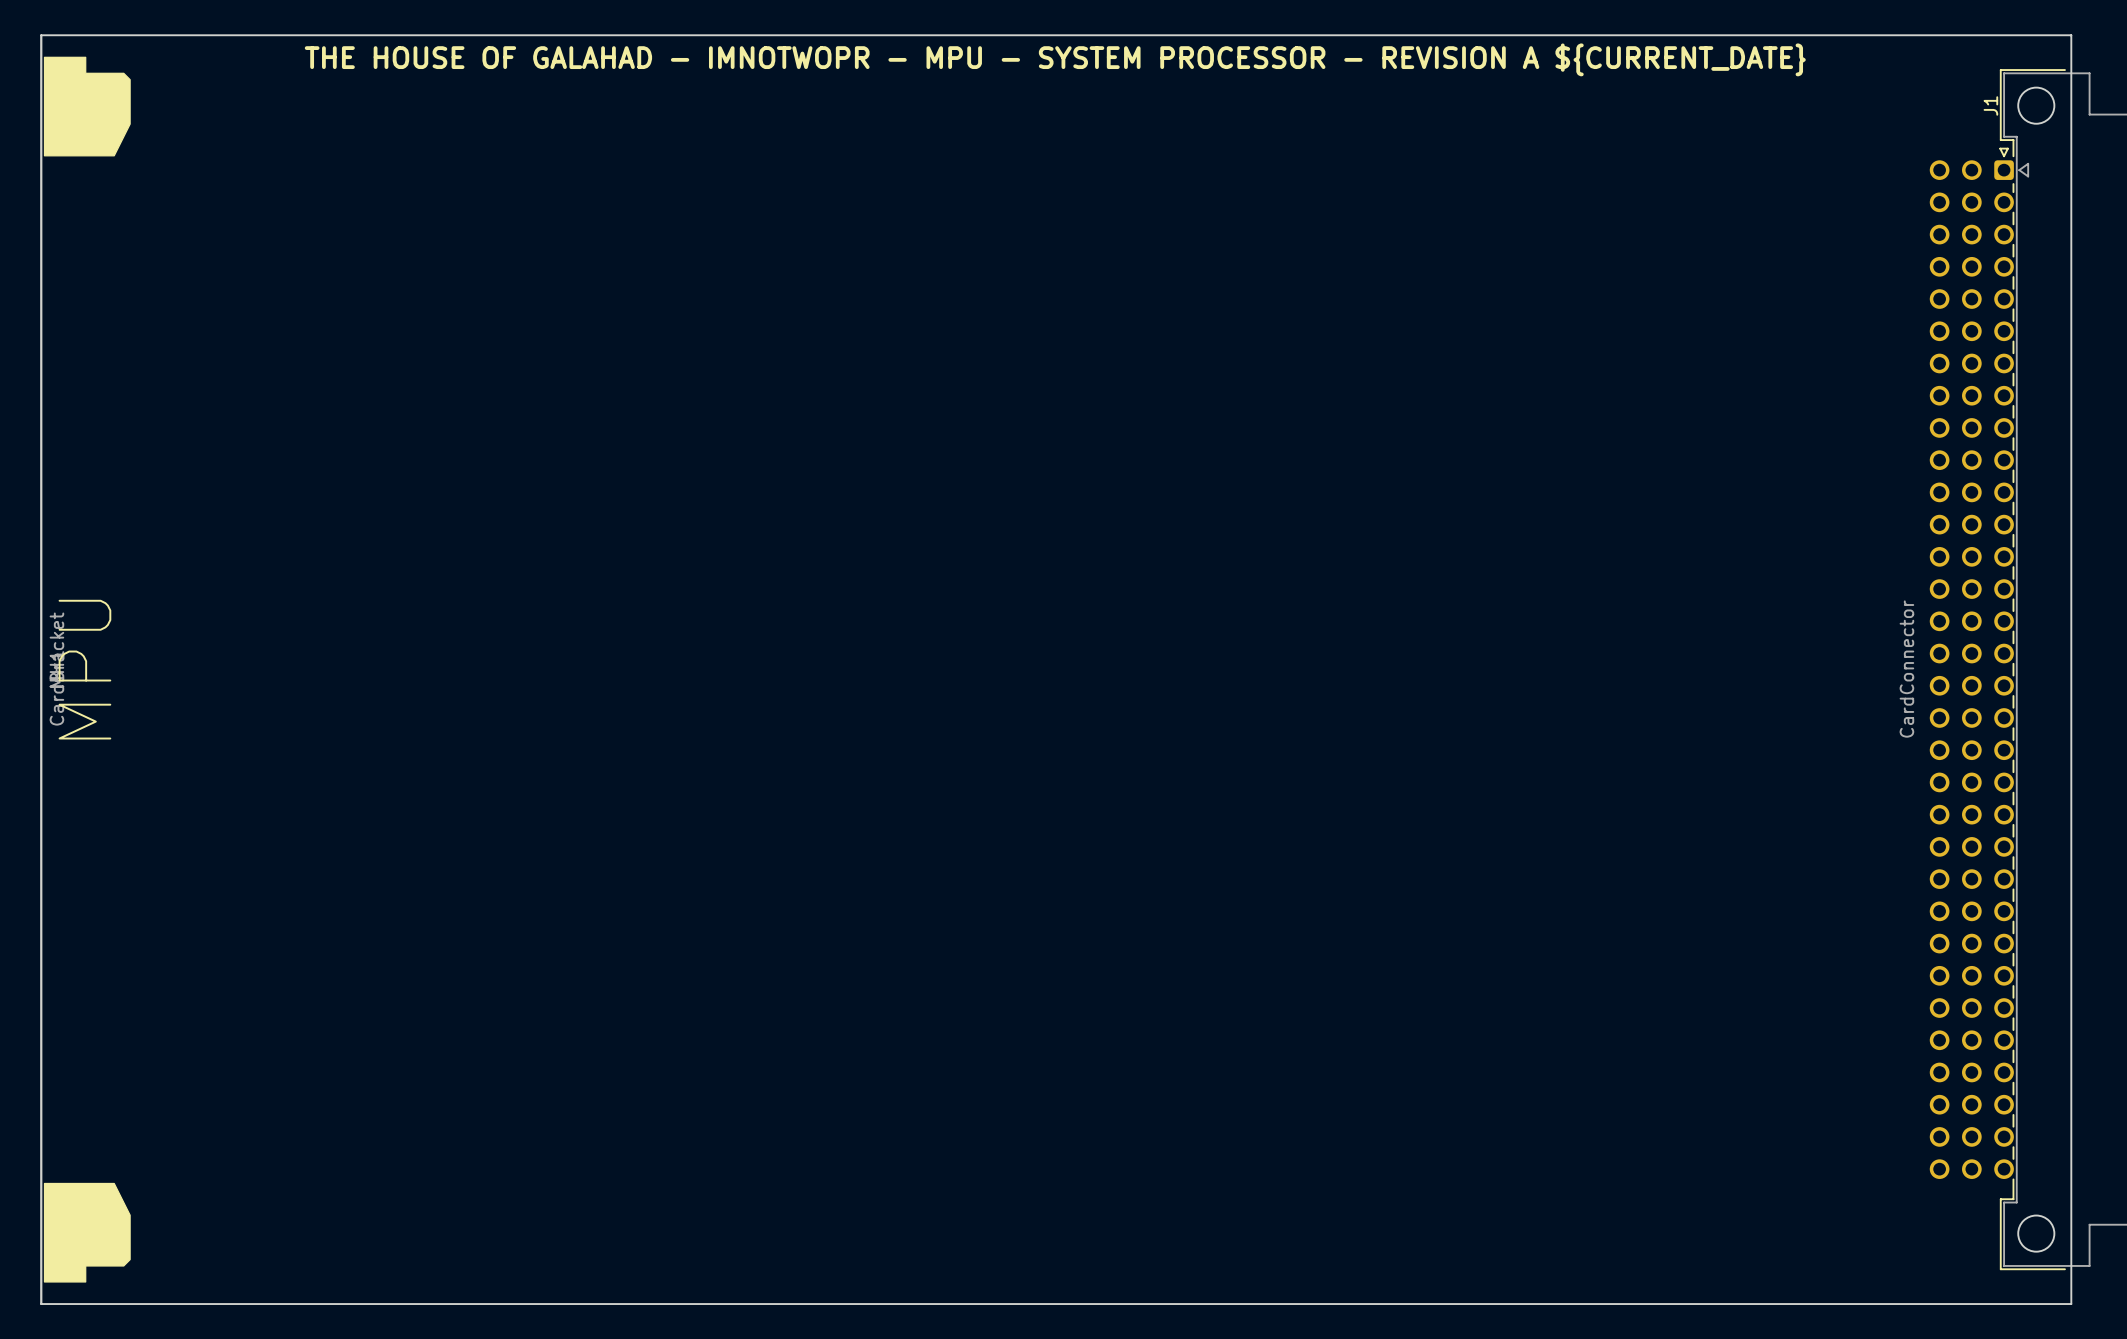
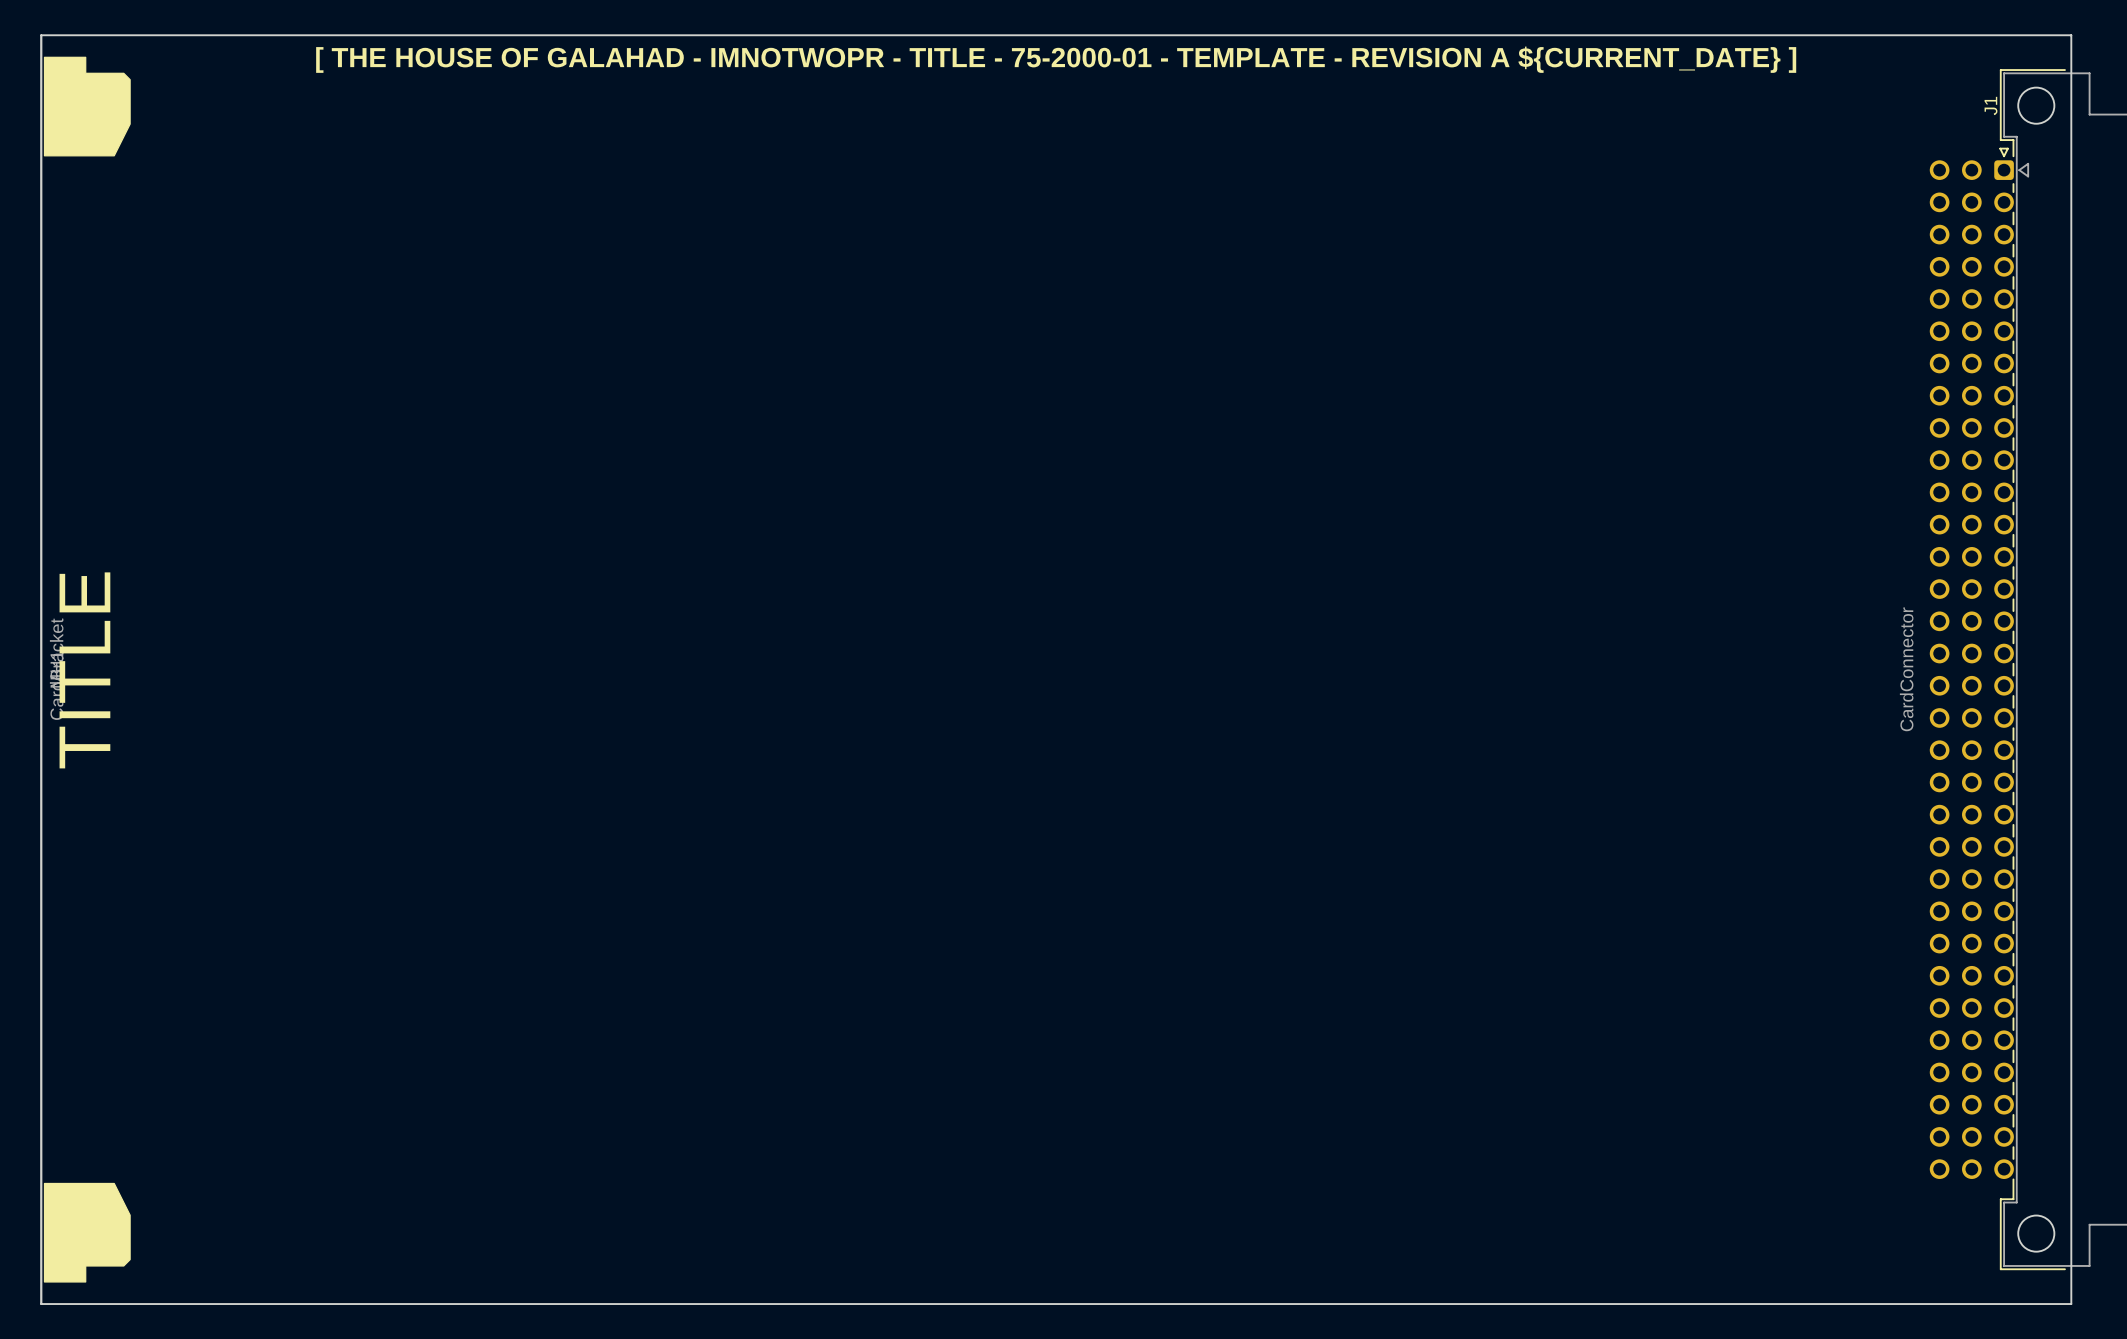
text: THE HOUSE OF GALAHAD - IMNOTWOPR - MPU - SYSTEM PROCESSOR - REVISION A ${CURRENT_DATE} (1055, 59) -> [ THE HOUSE OF GALAHAD - IMNOTWOPR - TITLE - 75-2000-01 - TEMPLATE - REVISION A ${CURRENT_DATE} ] (1056, 59)
text: MPU (84, 669) -> TITLE (84, 670)

